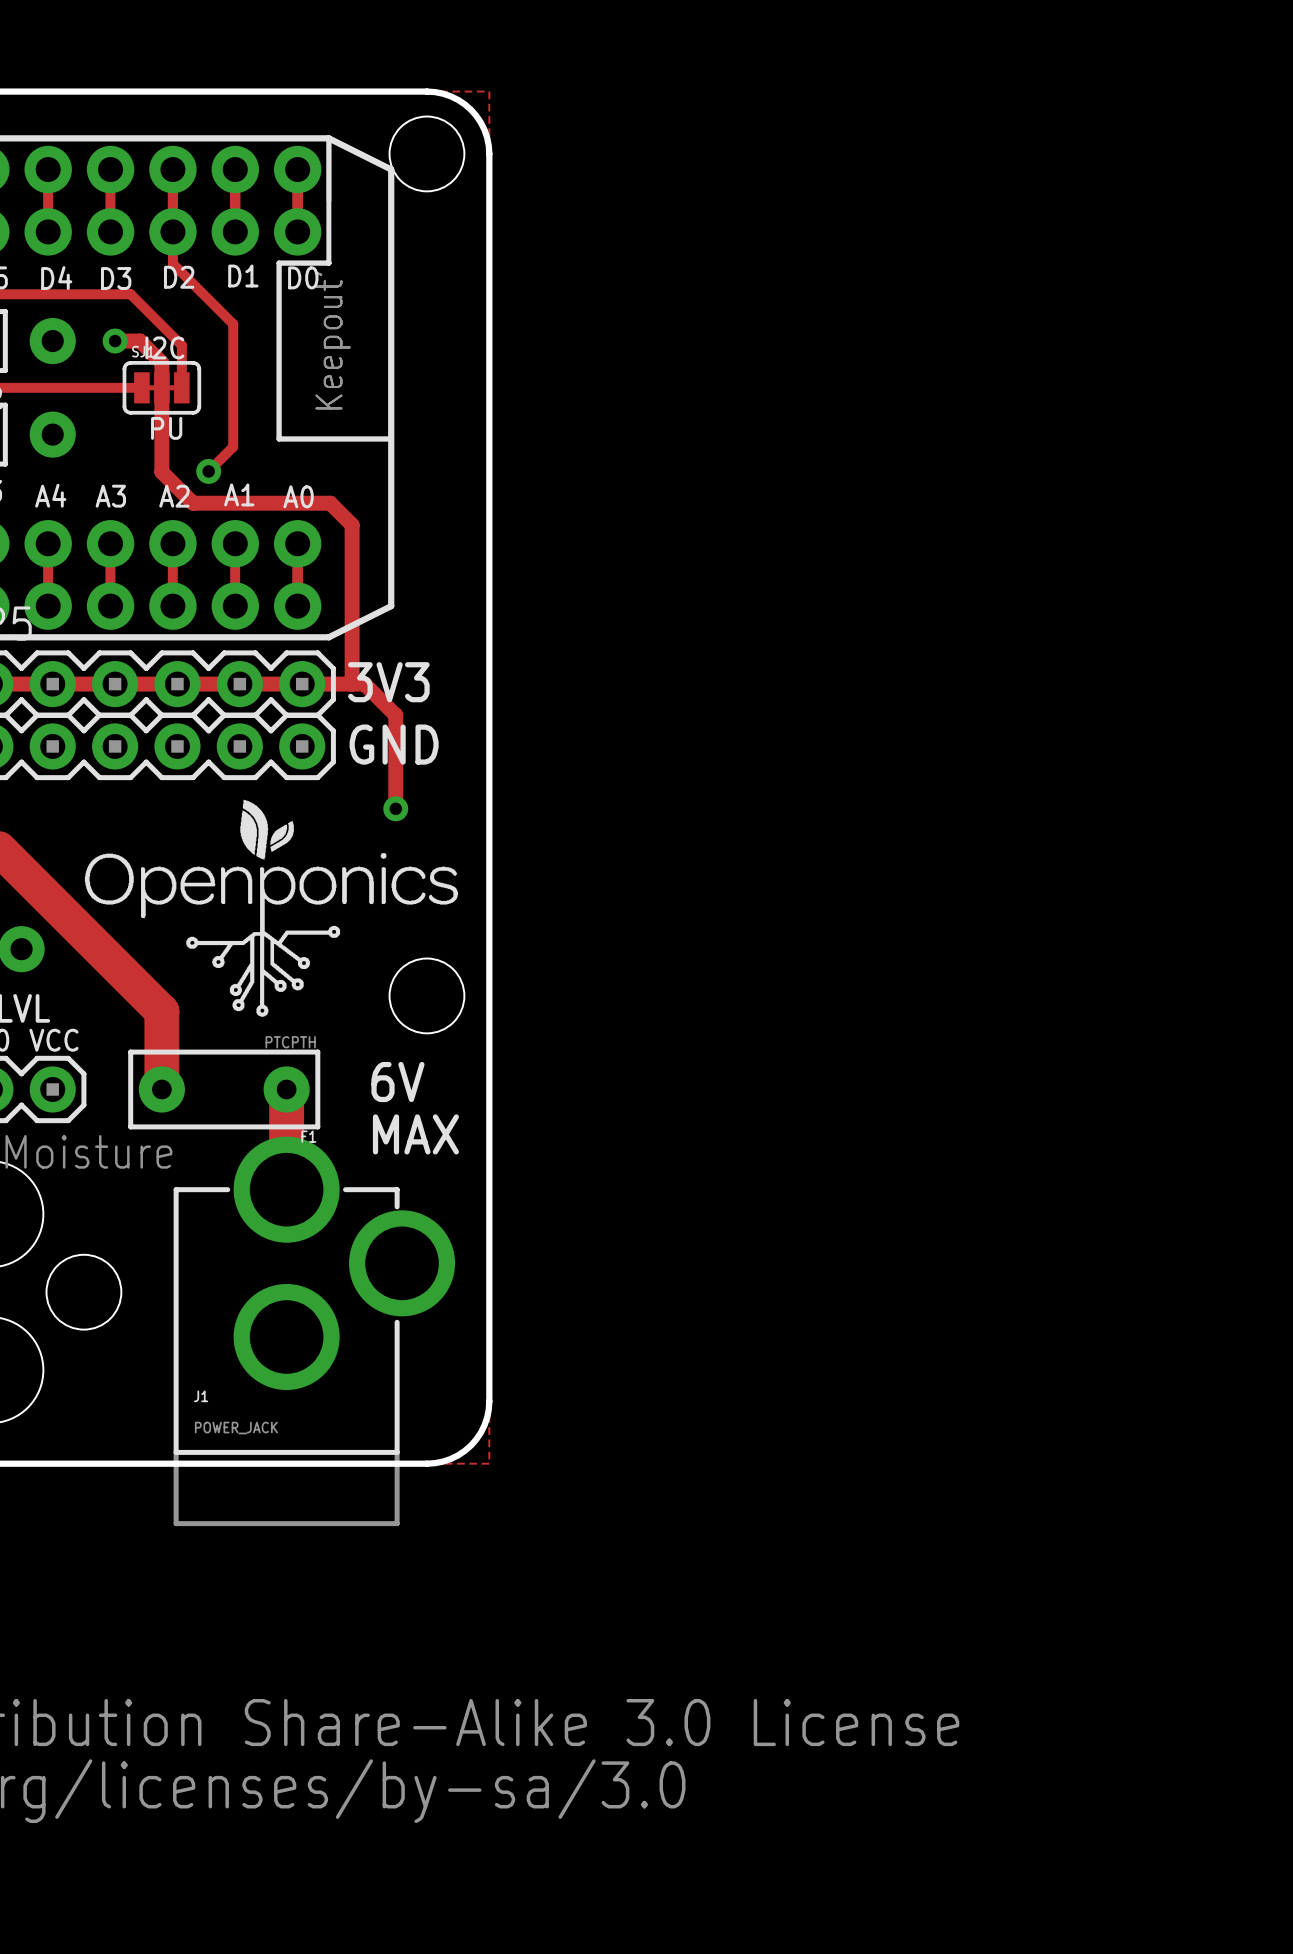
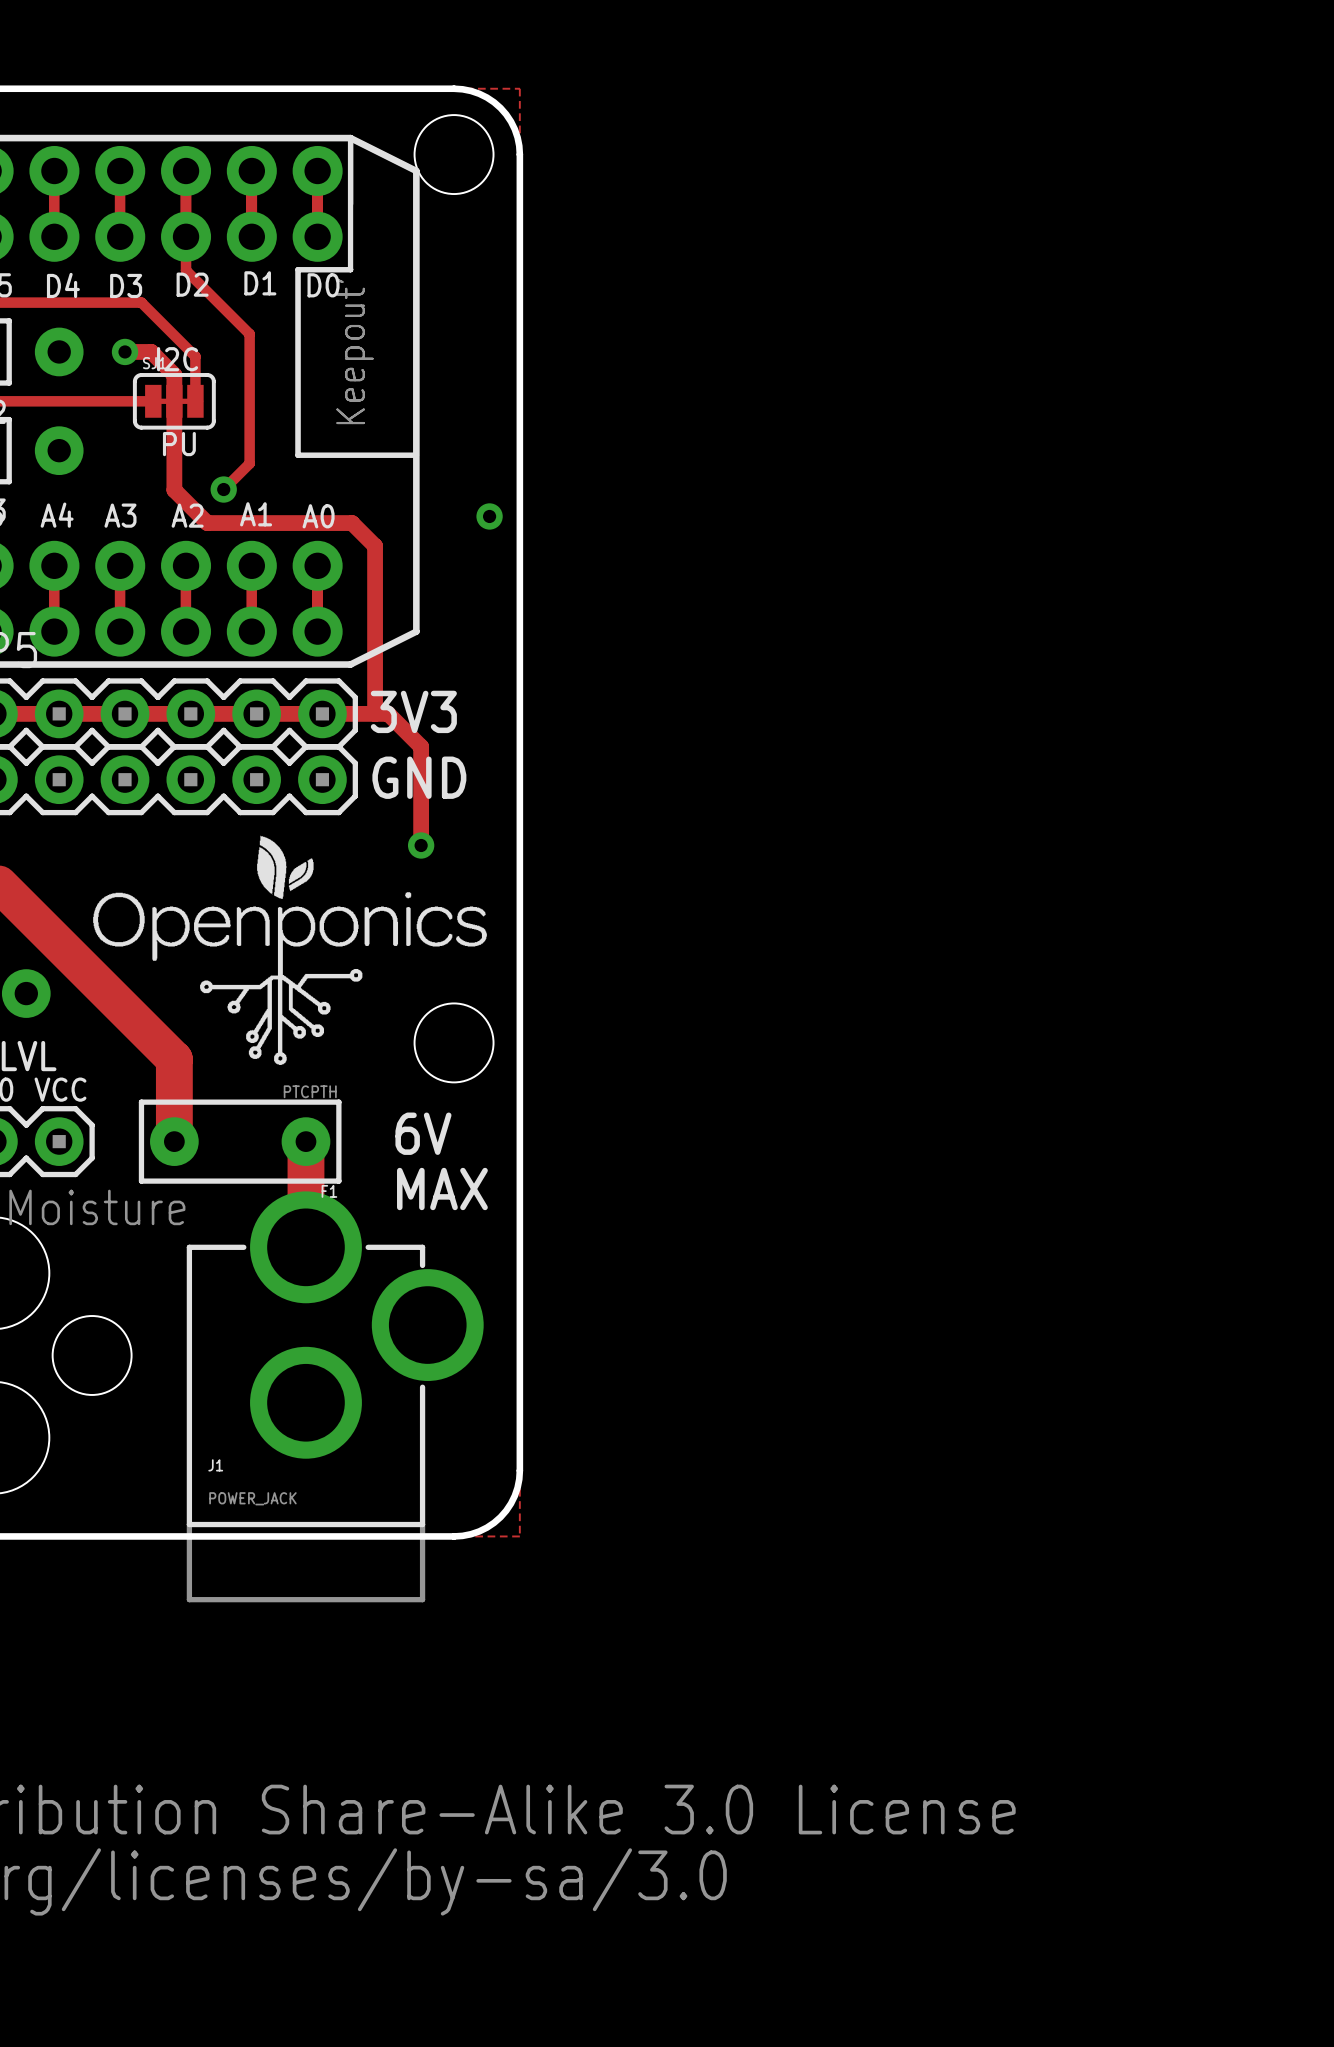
via: none -> (489, 516)

